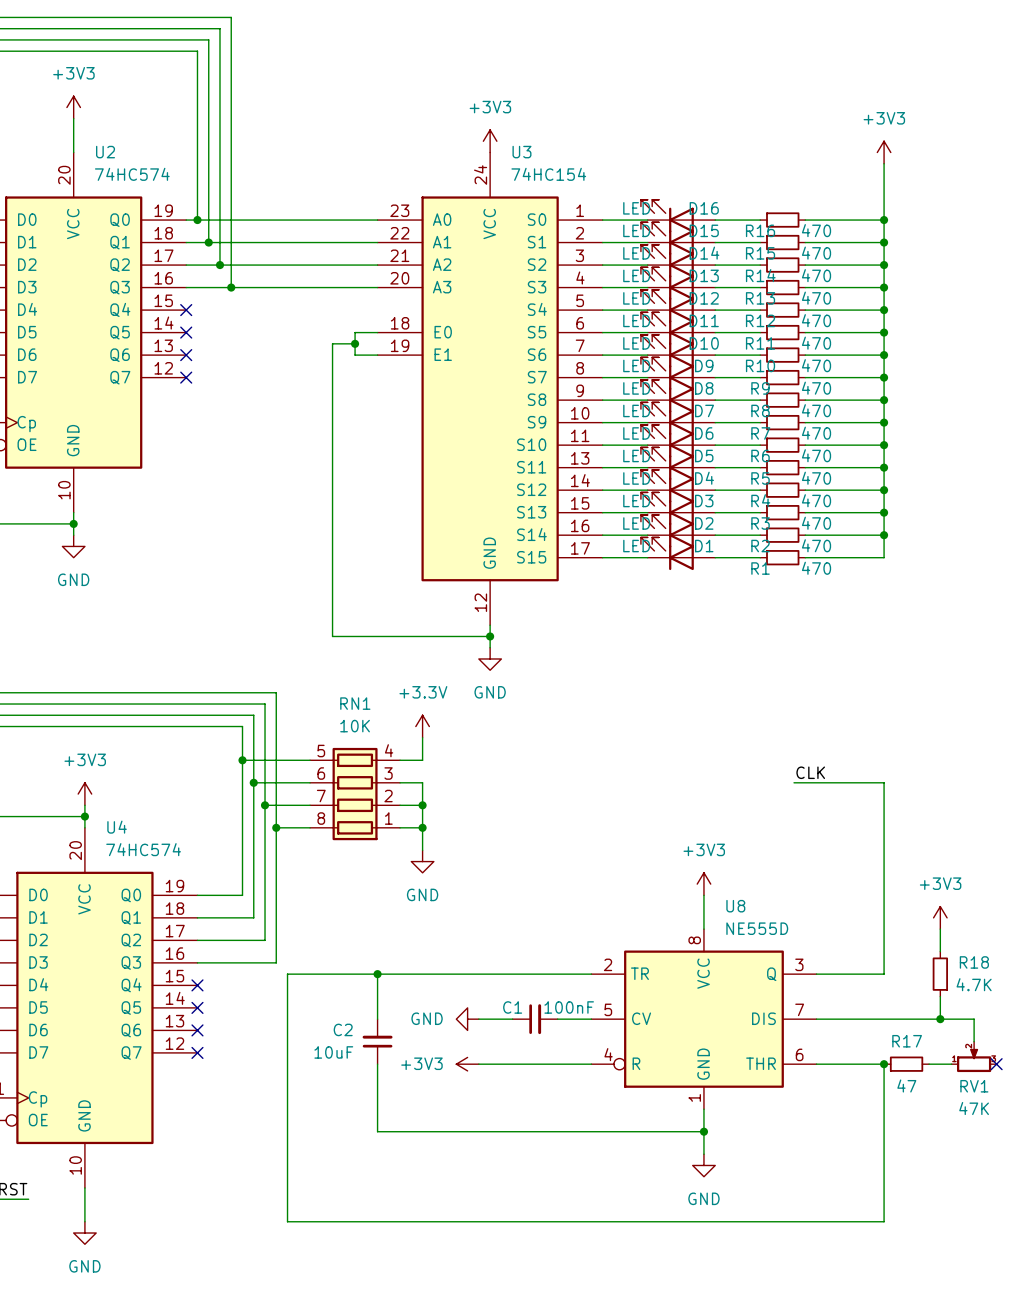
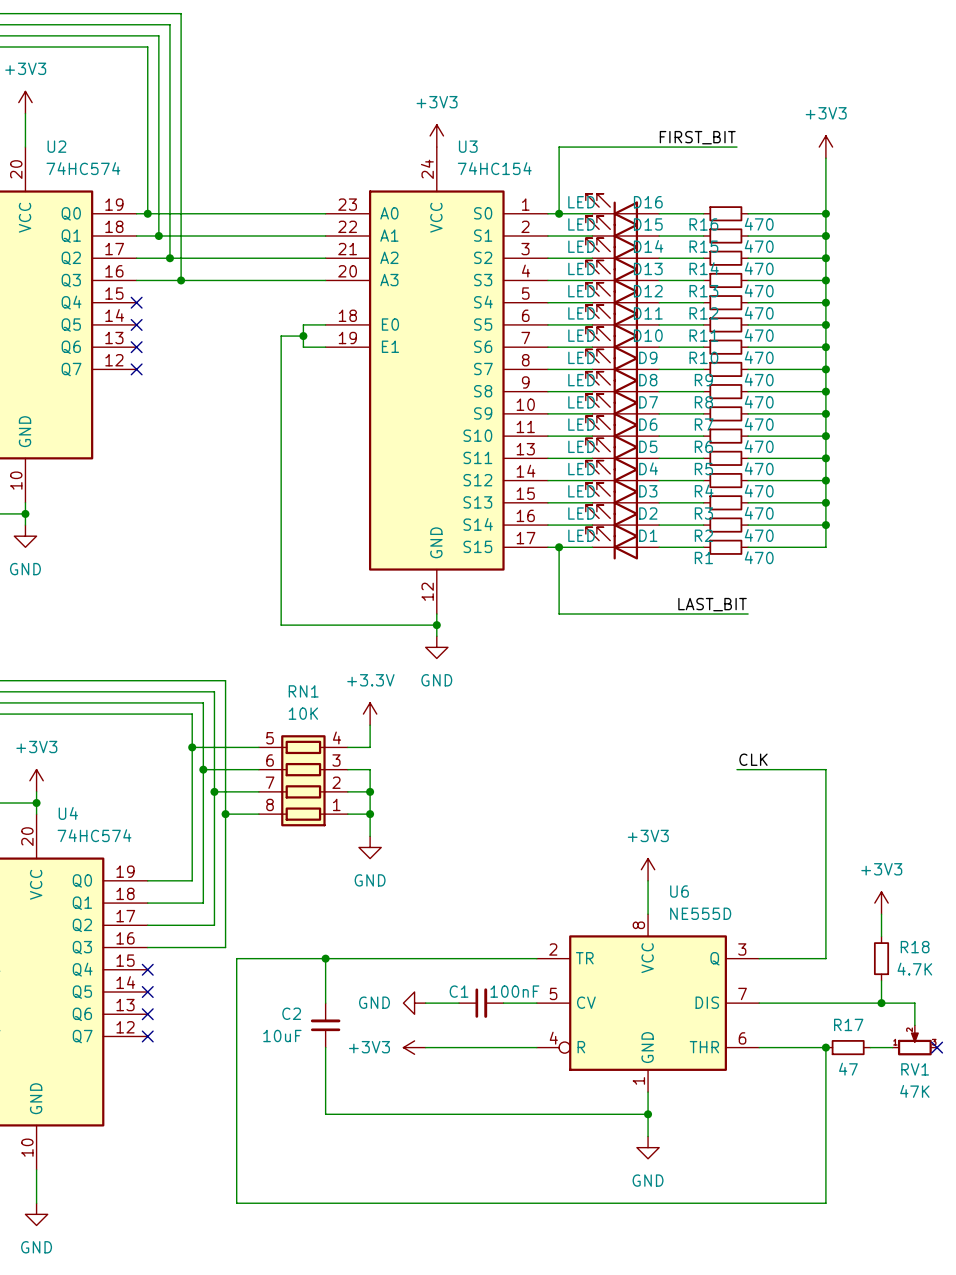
label: none -> FIRST_BIT (697, 137)
wire: none -> (736, 147) (559, 147) (559, 213)
junction: none -> (559, 213)
wire: none -> (559, 547) (559, 614) (748, 614)
junction: none -> (559, 547)
label: none -> LAST_BIT (712, 604)
U8 name: U8 (735, 906) -> U6 (679, 891)

